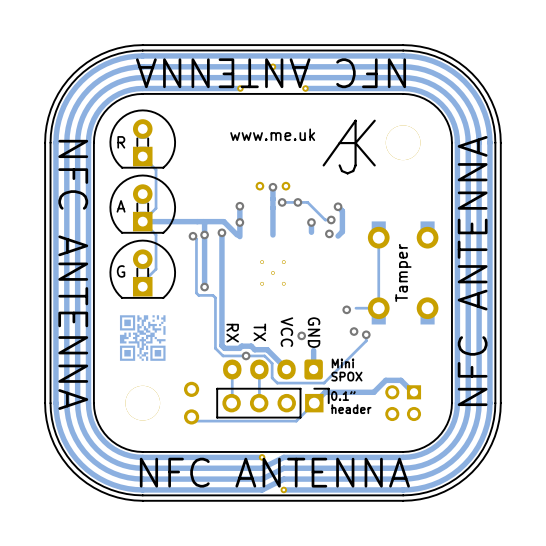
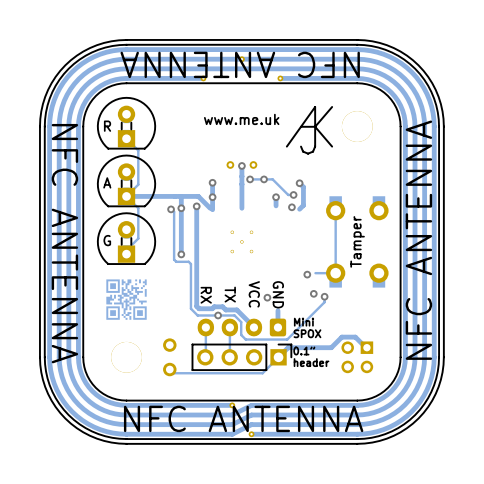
part footprint: [49, 49, 497, 497] -> [44, 44, 440, 440]

